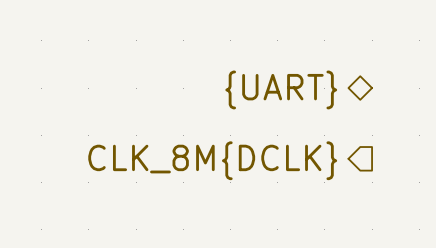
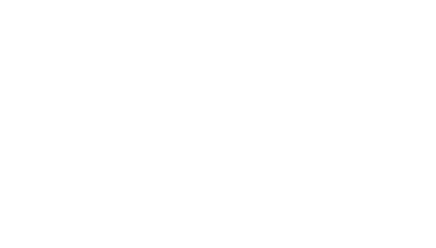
hierarchical label: {UART} (281, 89) -> none
hierarchical label: CLK_8M{DCLK} (212, 160) -> none

